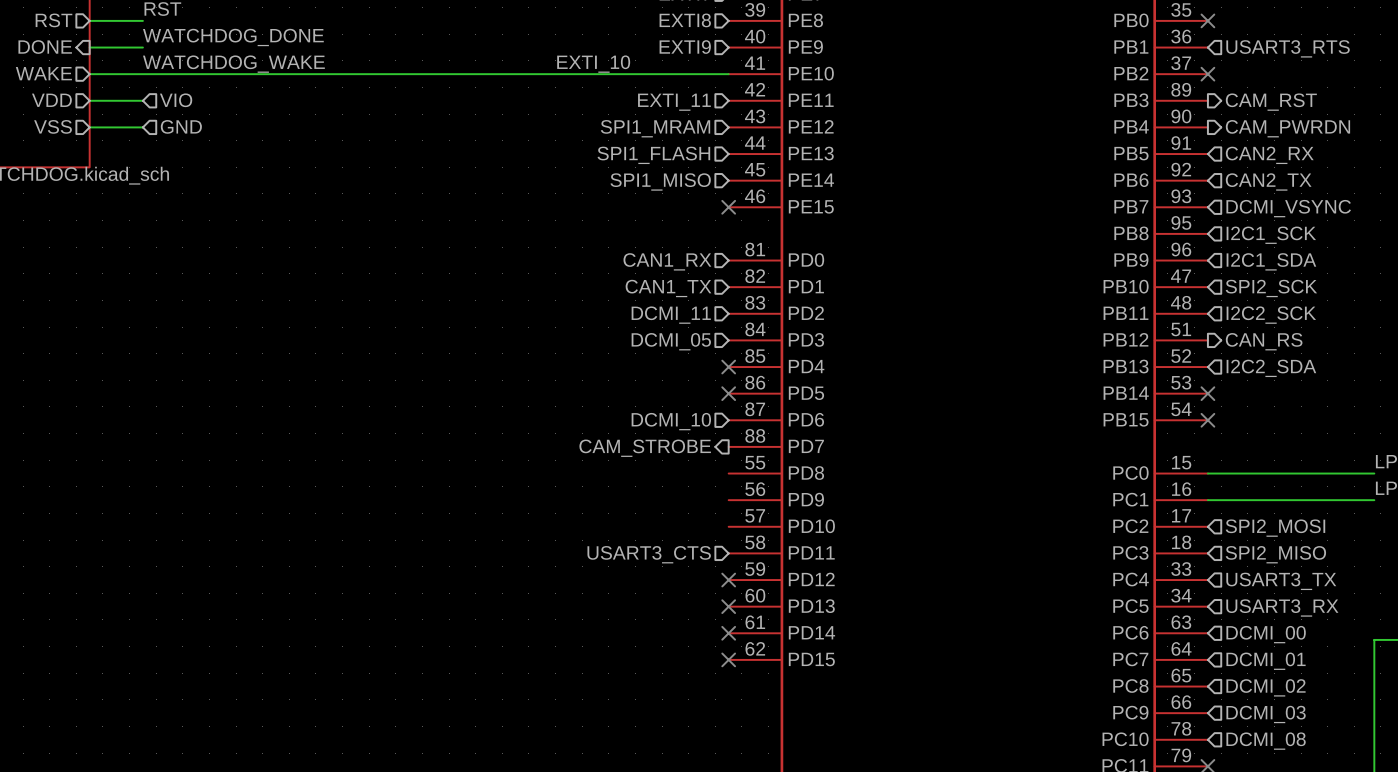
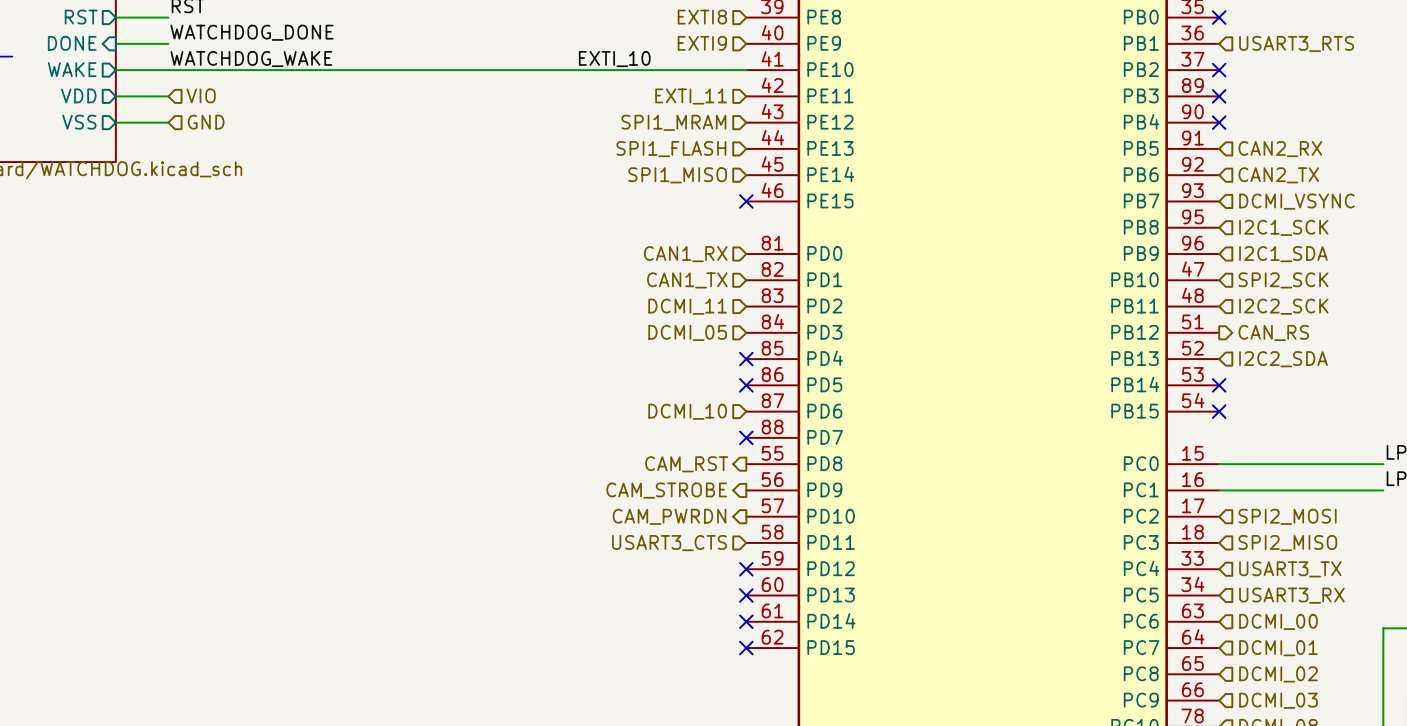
no-connect mark: none -> (1219, 96)
hierarchical label: CAM_RST (1271, 102) -> none
no-connect mark: none -> (1219, 122)
hierarchical label: CAM_PWRDN (1287, 128) -> none
no-connect mark: none -> (746, 437)
hierarchical label position: CAM_STROBE (645, 448) -> CAM_STROBE (666, 490)
hierarchical label: none -> CAM_RST (686, 464)
hierarchical label: none -> CAM_PWRDN (669, 516)

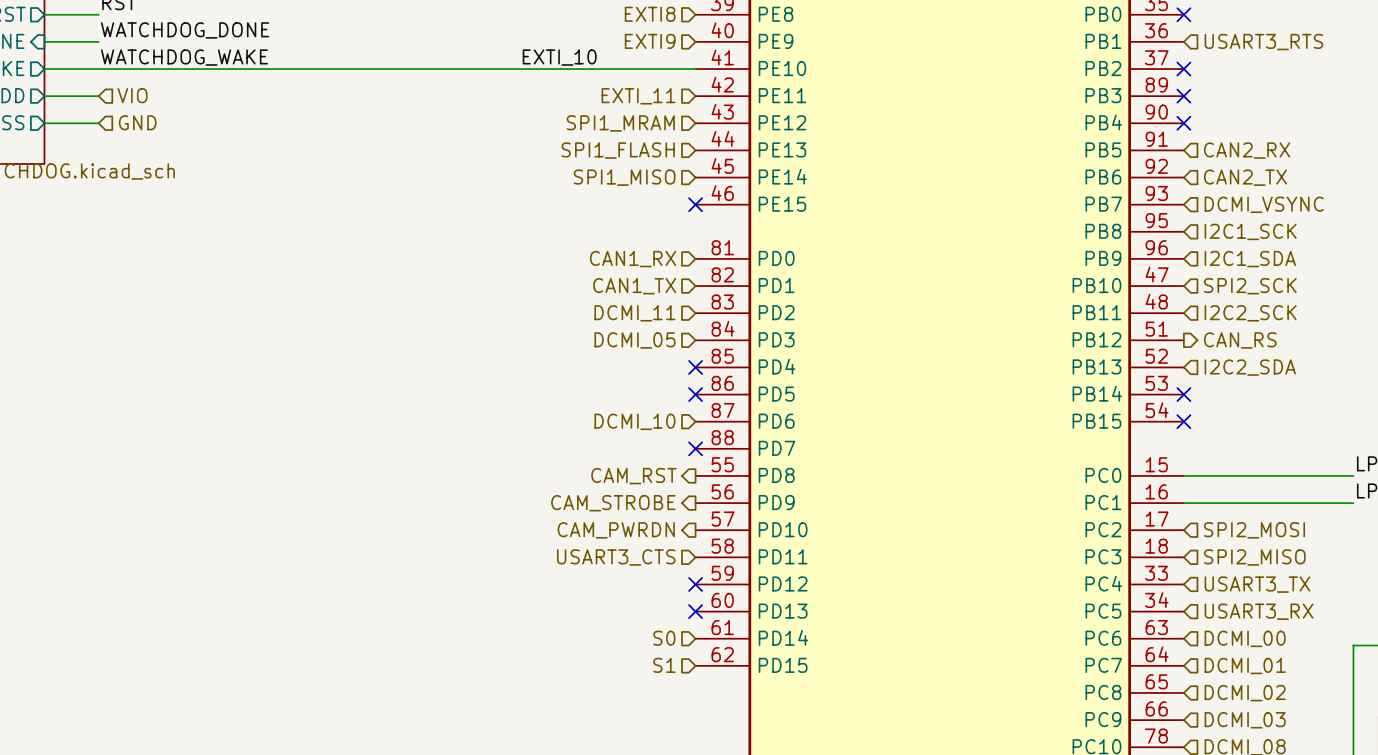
hierarchical label: none -> S0 (664, 638)
no-connect mark: (746, 621) -> none
hierarchical label: none -> S1 (664, 665)
no-connect mark: (746, 648) -> none

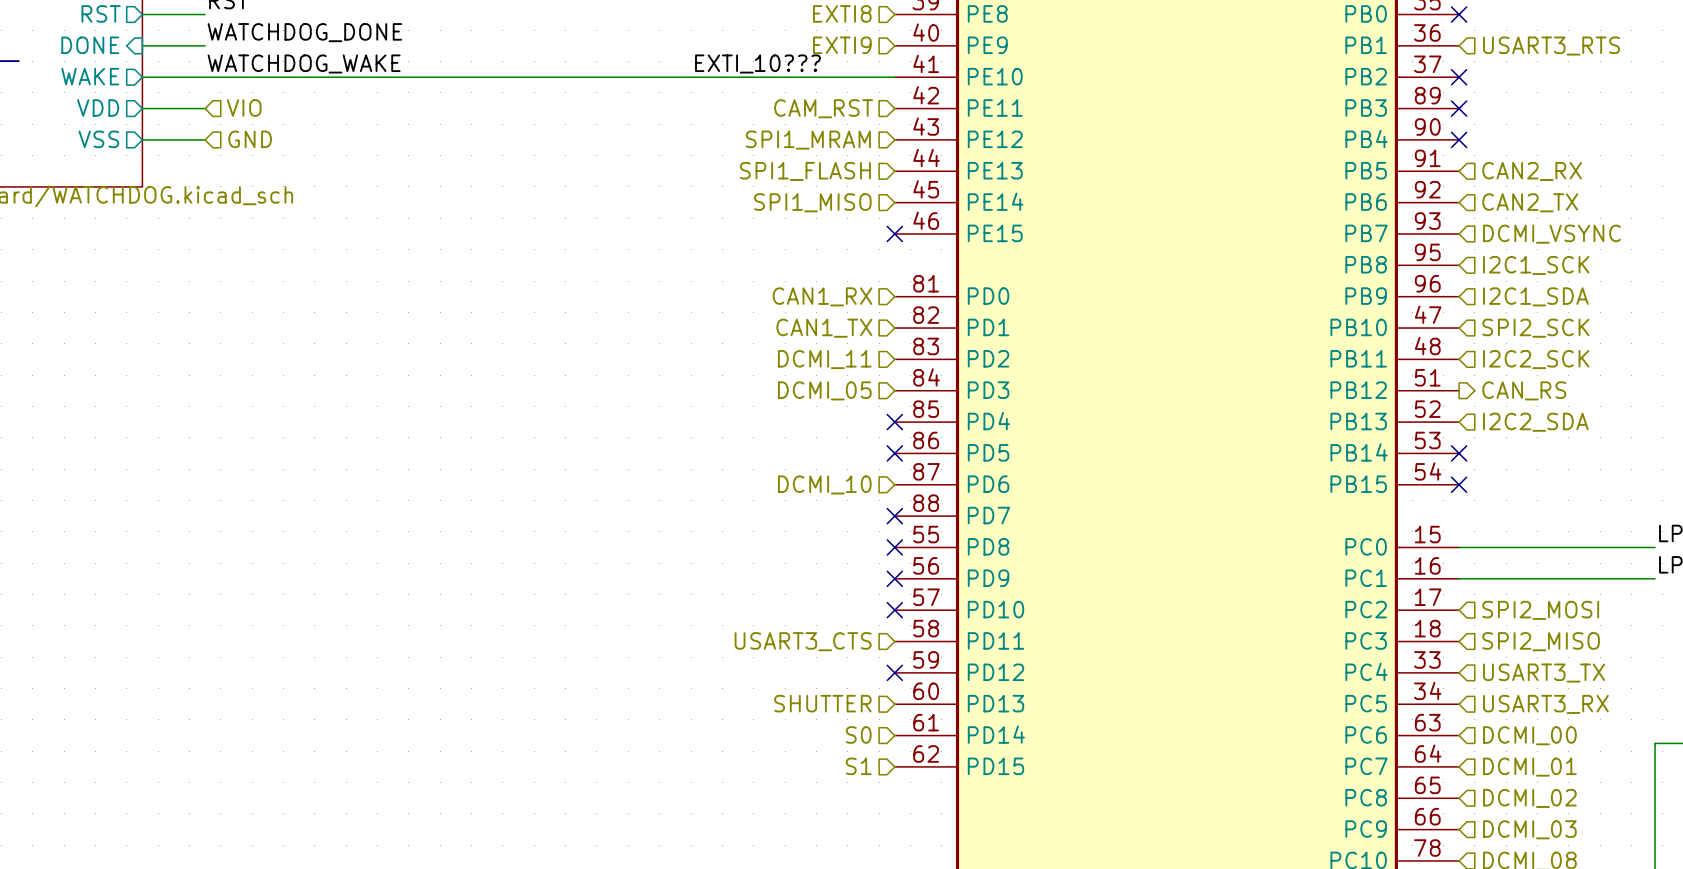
label: EXTI_10 (559, 57) -> EXTI_10??? (757, 63)
hierarchical label: EXTI_11 (638, 96) -> CAM_RST (823, 108)
no-connect mark: none -> (894, 547)
hierarchical label: CAM_RST (633, 476) -> none
hierarchical label: CAM_STROBE (613, 503) -> none
no-connect mark: none -> (894, 578)
hierarchical label: CAM_PWRDN (616, 530) -> none
no-connect mark: none -> (894, 610)
hierarchical label: none -> SHUTTER (822, 703)
no-connect mark: (695, 611) -> none

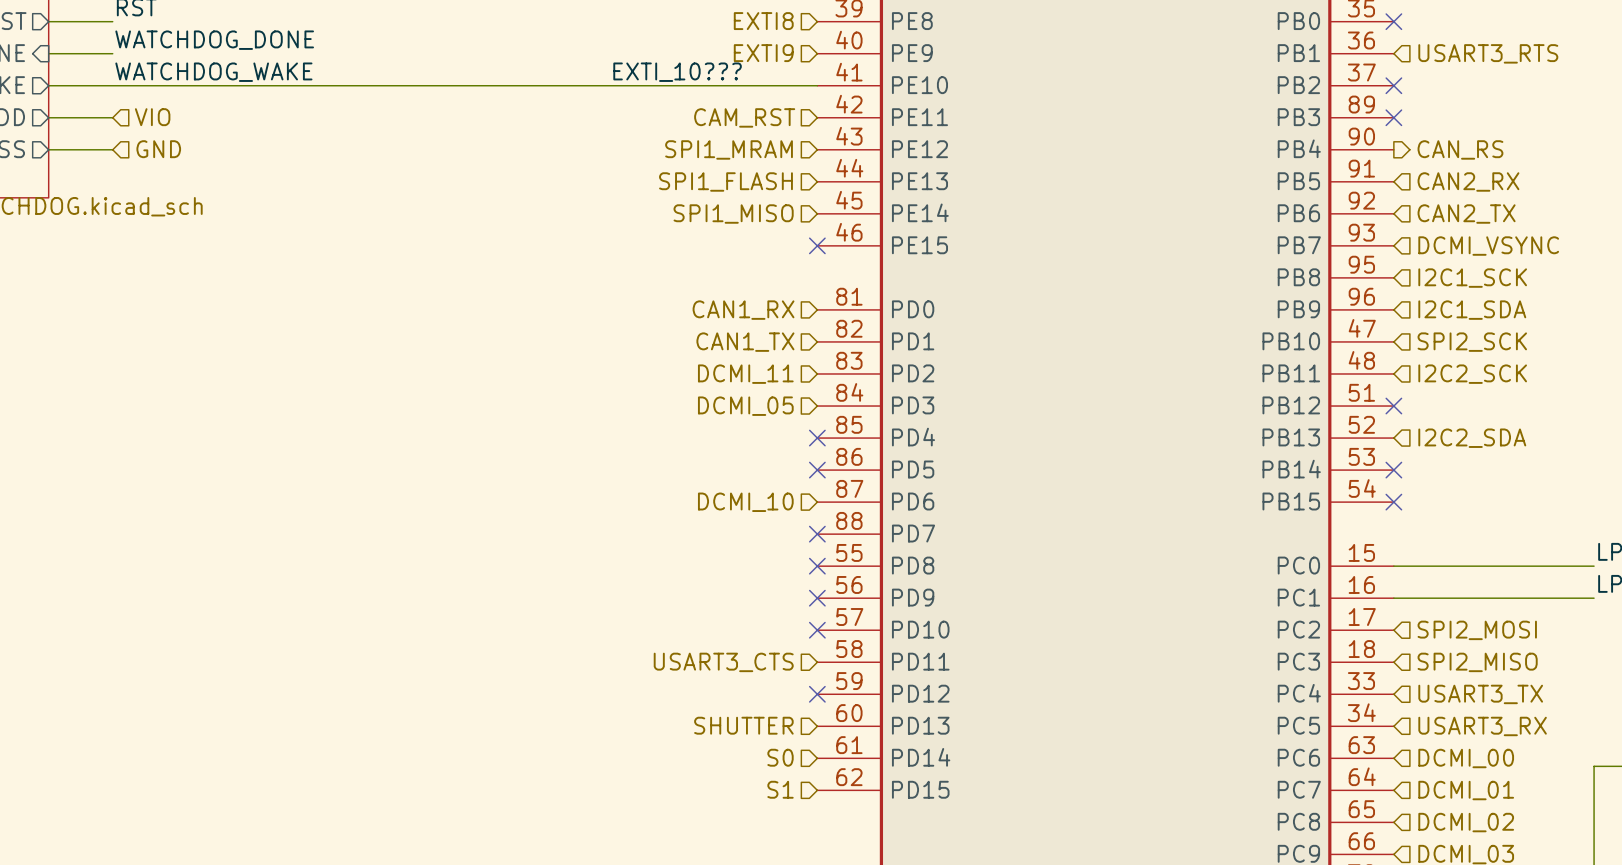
no-connect mark: (1459, 139) -> none
no-connect mark: none -> (1393, 406)
hierarchical label position: CAN_RS (1524, 390) -> CAN_RS (1460, 149)

